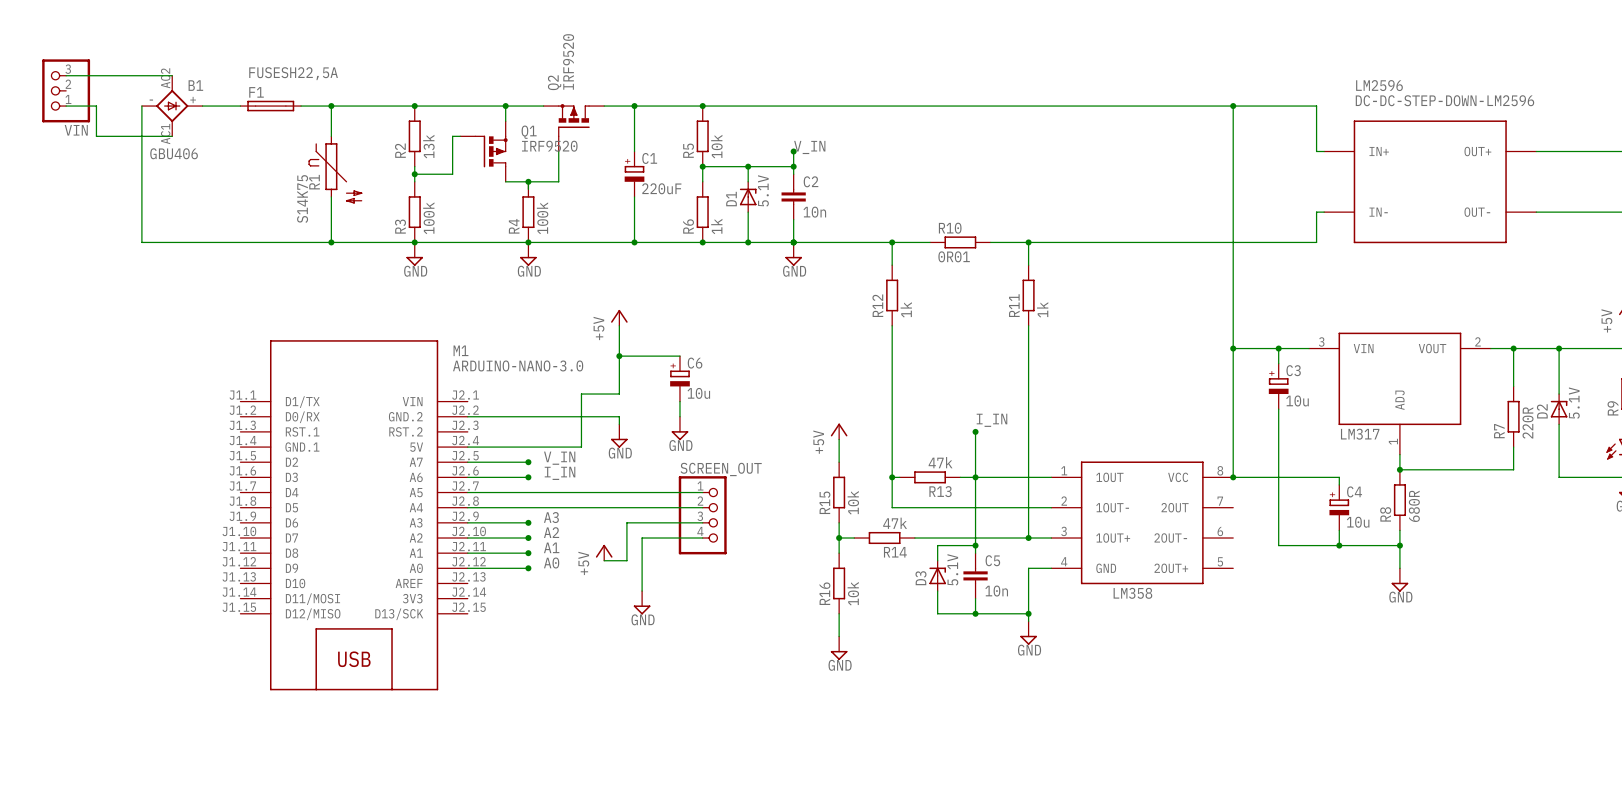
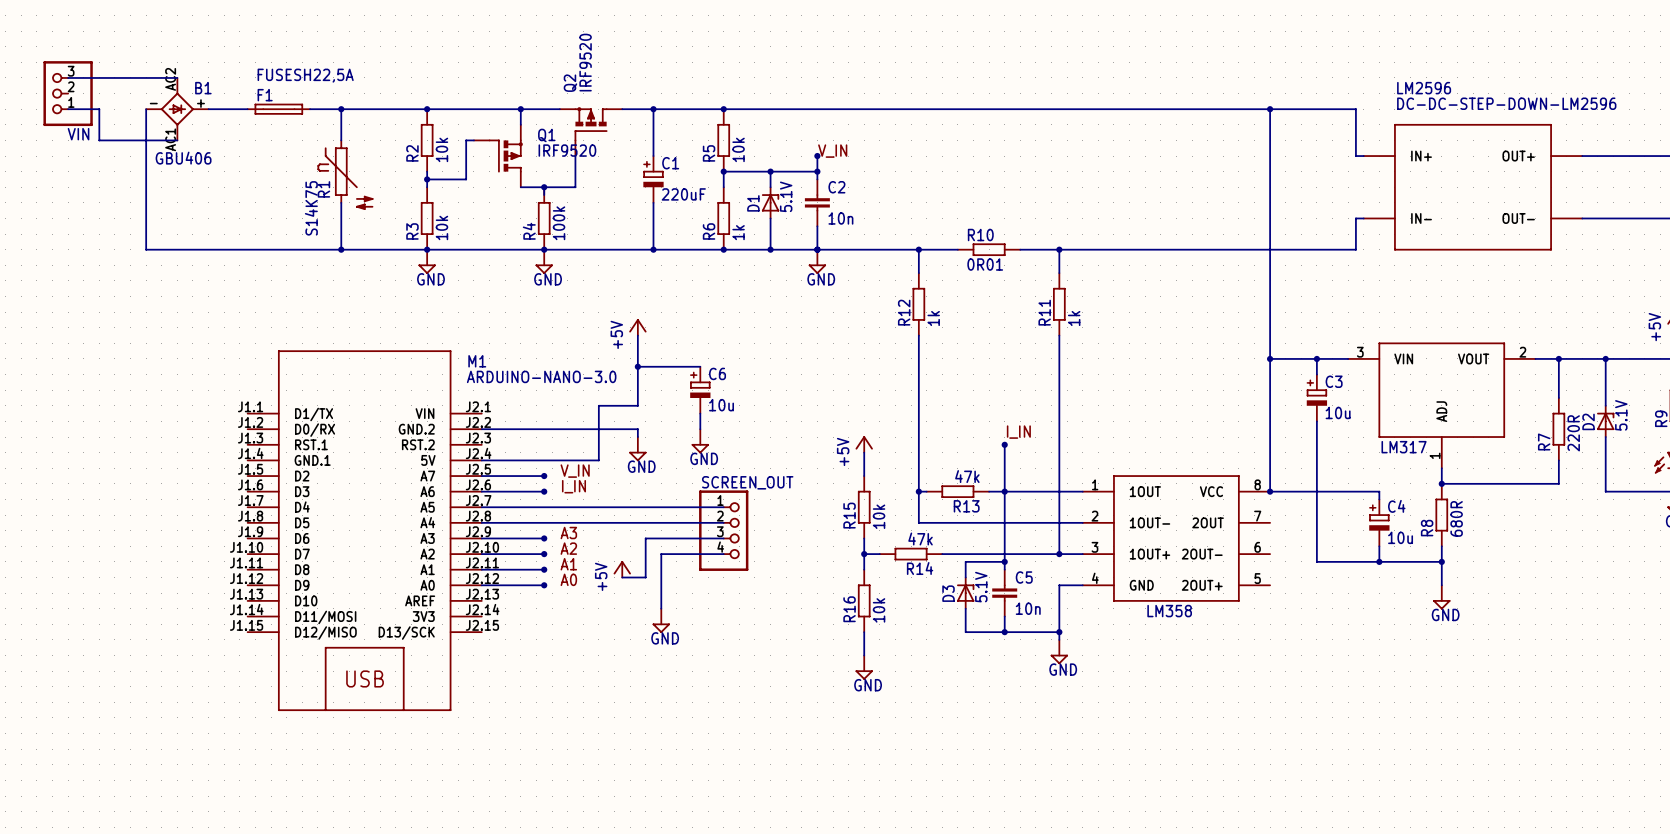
R2 value: 13k (428, 146) -> 10k (441, 149)
R3 value: 100k (428, 218) -> 10k (441, 227)

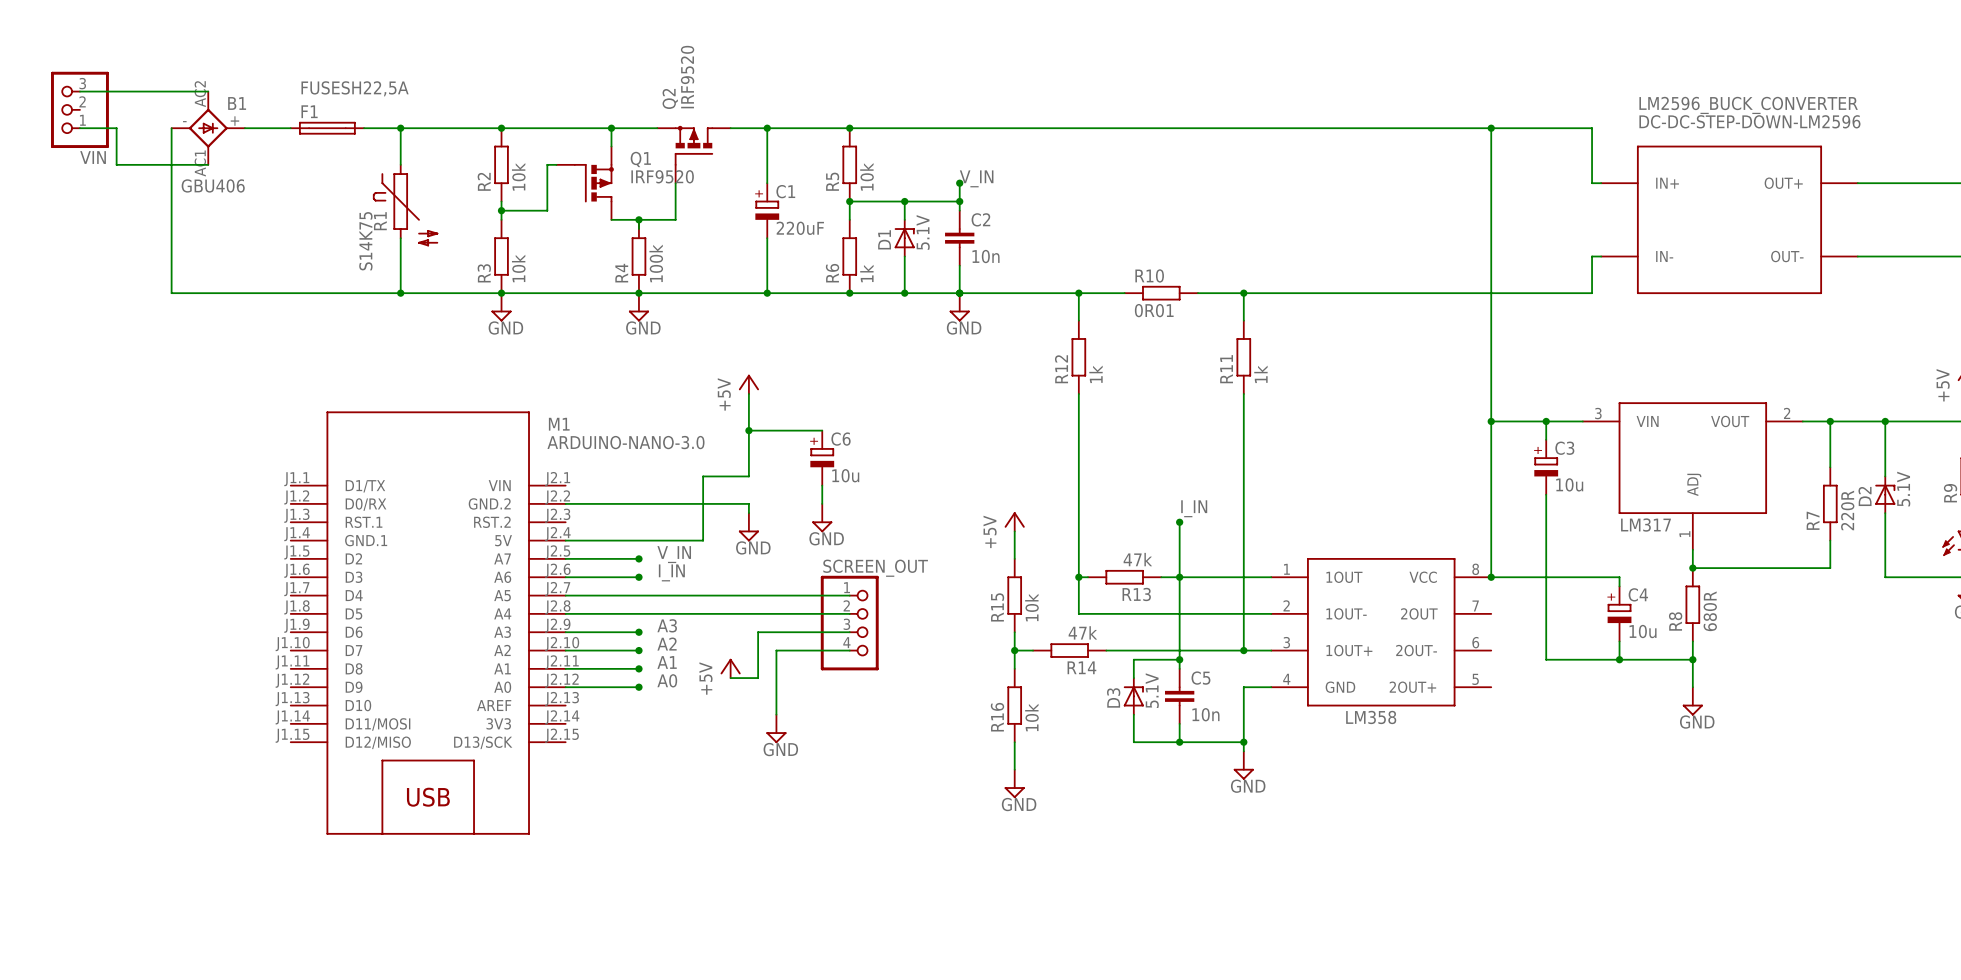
LM2596 name: LM2596 (1424, 88) -> LM2596_BUCK_CONVERTER (1748, 105)

